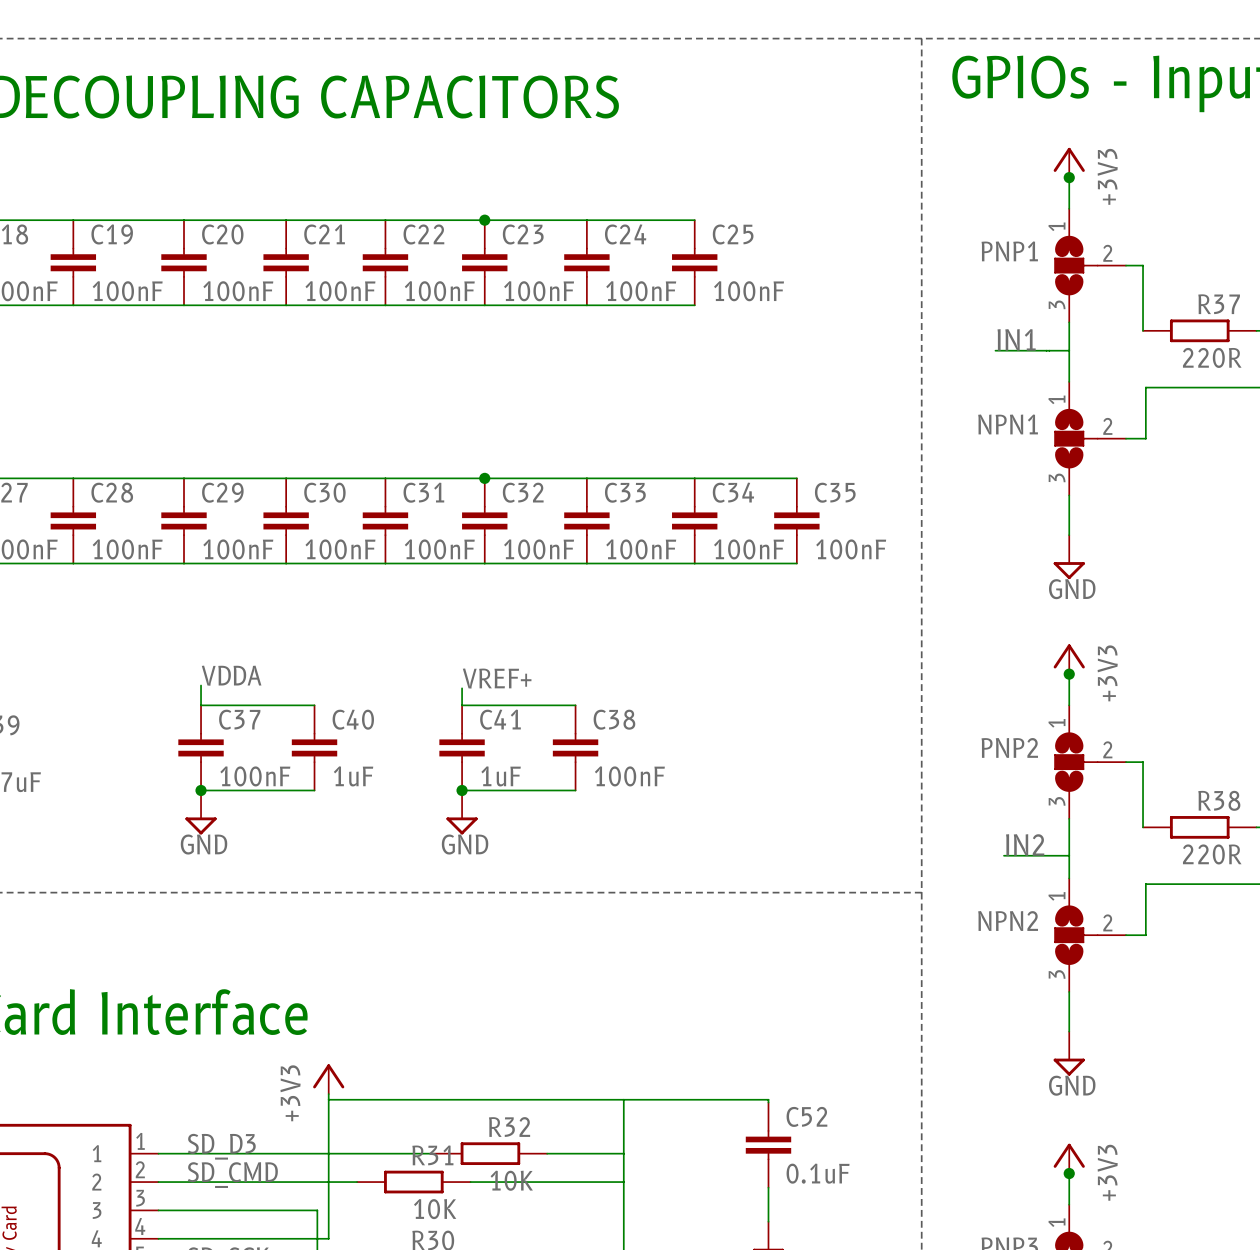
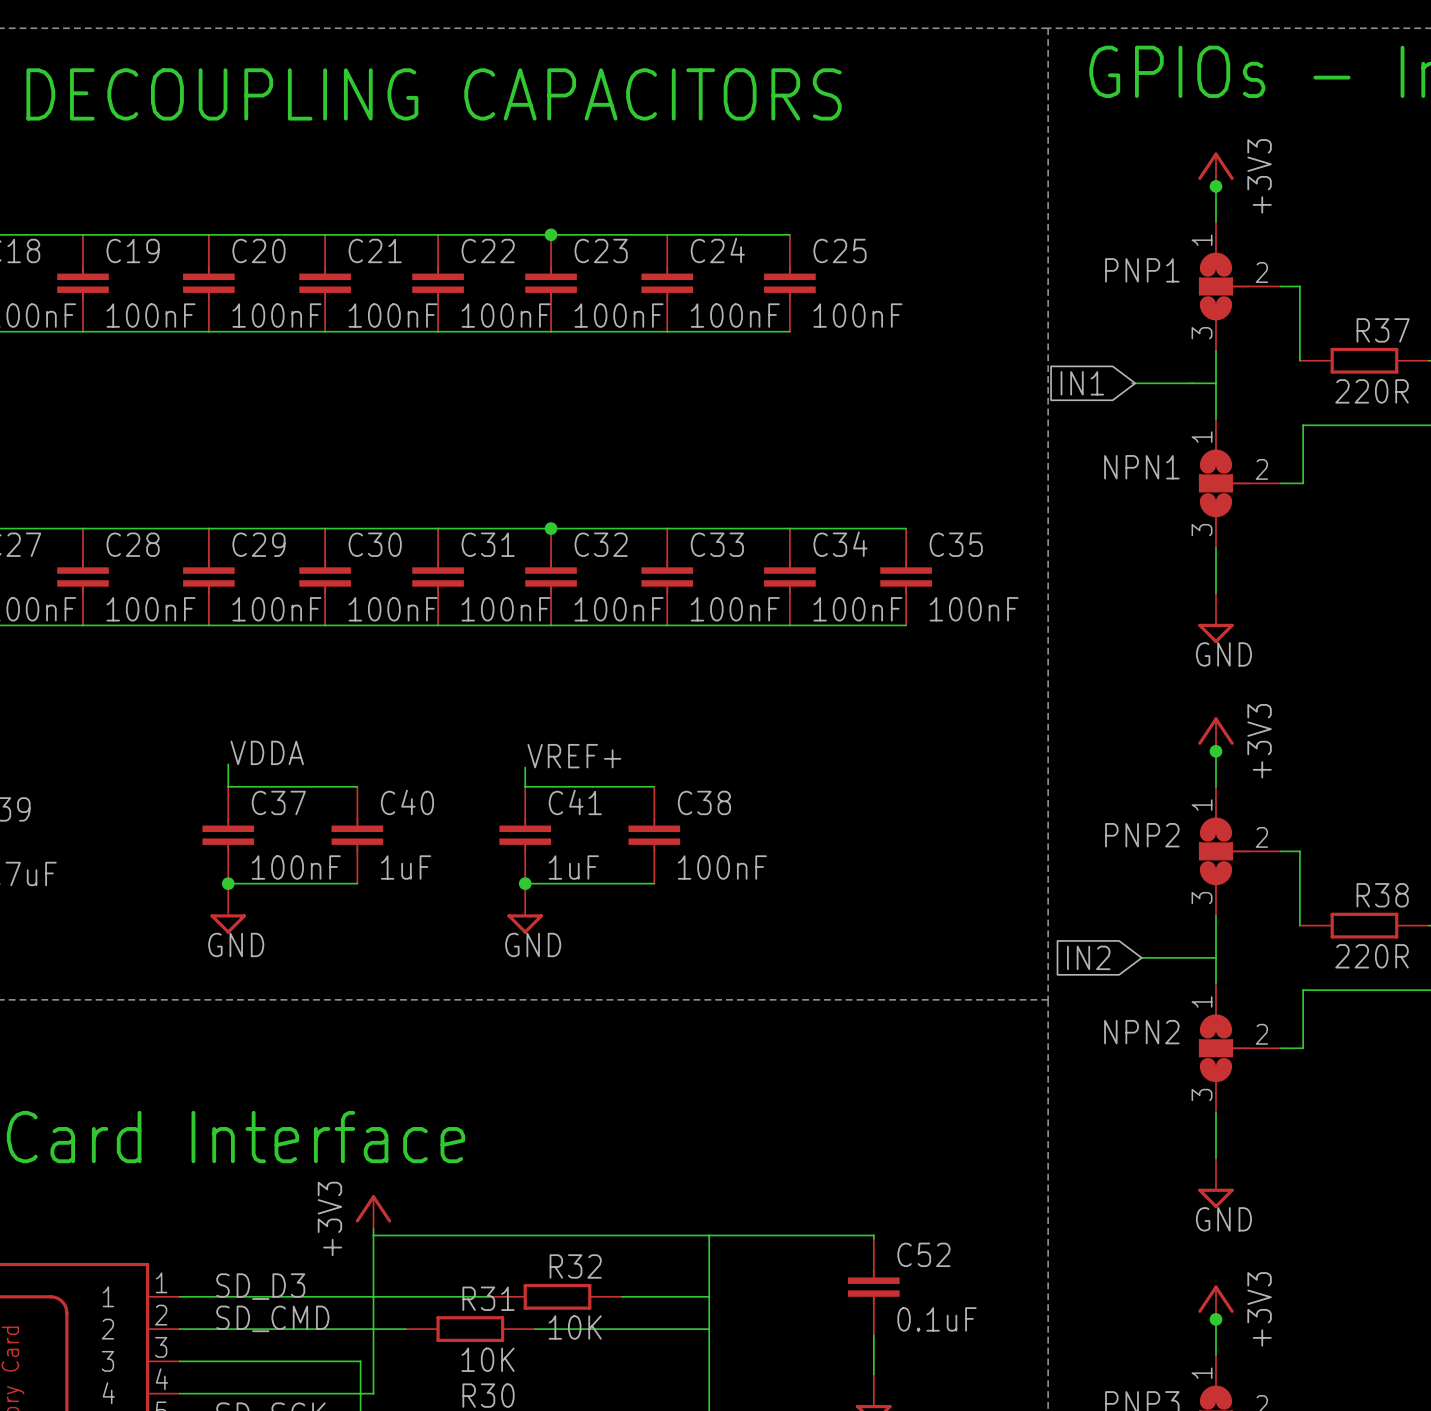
label: IN1 (1016, 339) -> none
global label: none -> IN1 (1082, 383)
label: IN2 (1025, 844) -> none
global label: none -> IN2 (1088, 957)

